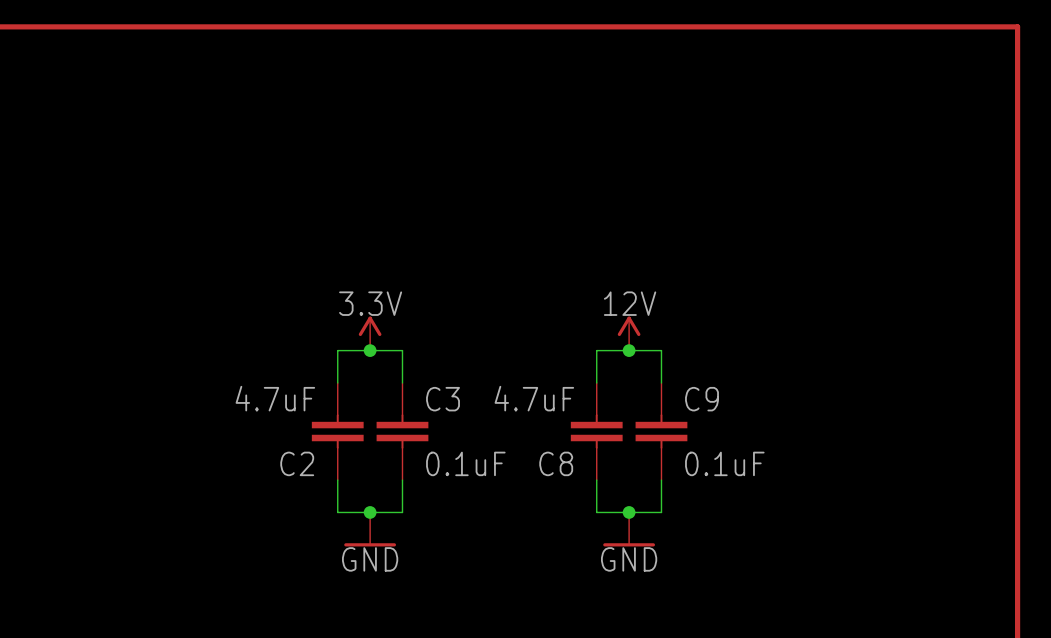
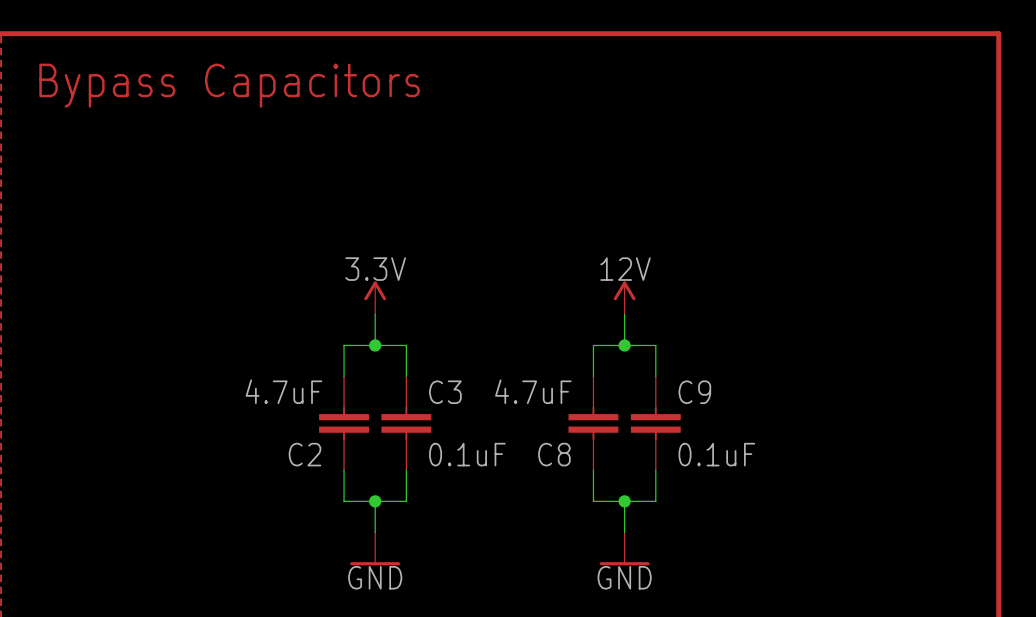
text: none -> Bypass Capacitors (229, 85)
power symbol position: 3.3V (370, 333) -> 3.3V (375, 297)
power symbol position: 12V (629, 333) -> 12V (624, 297)
power symbol position: GND (370, 529) -> GND (375, 548)
power symbol position: GND (629, 529) -> GND (624, 548)

